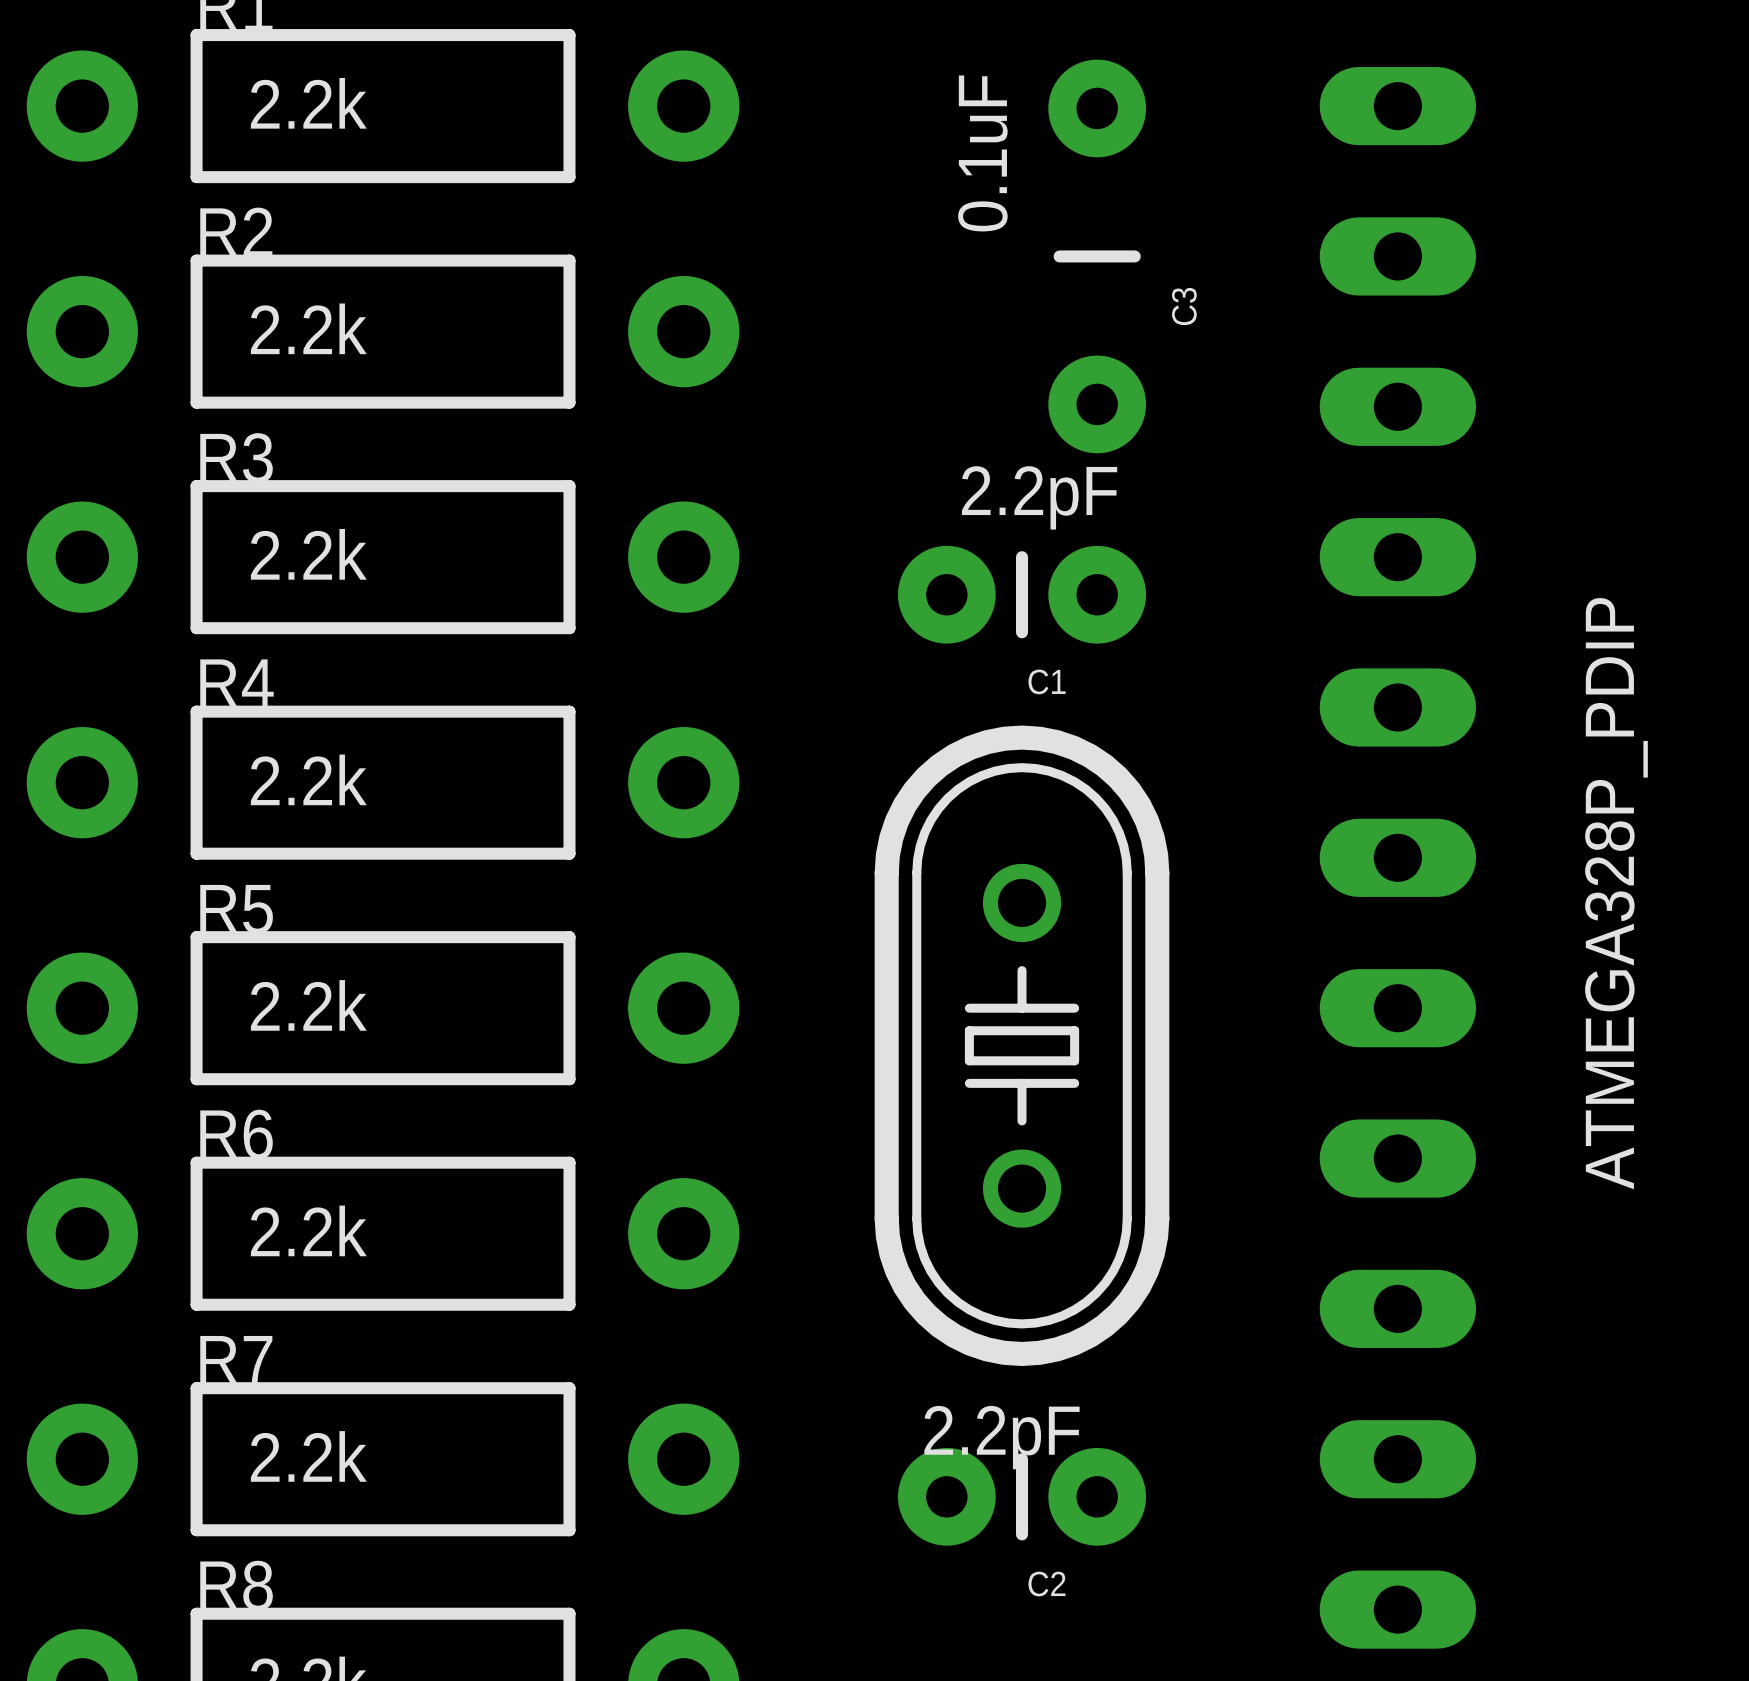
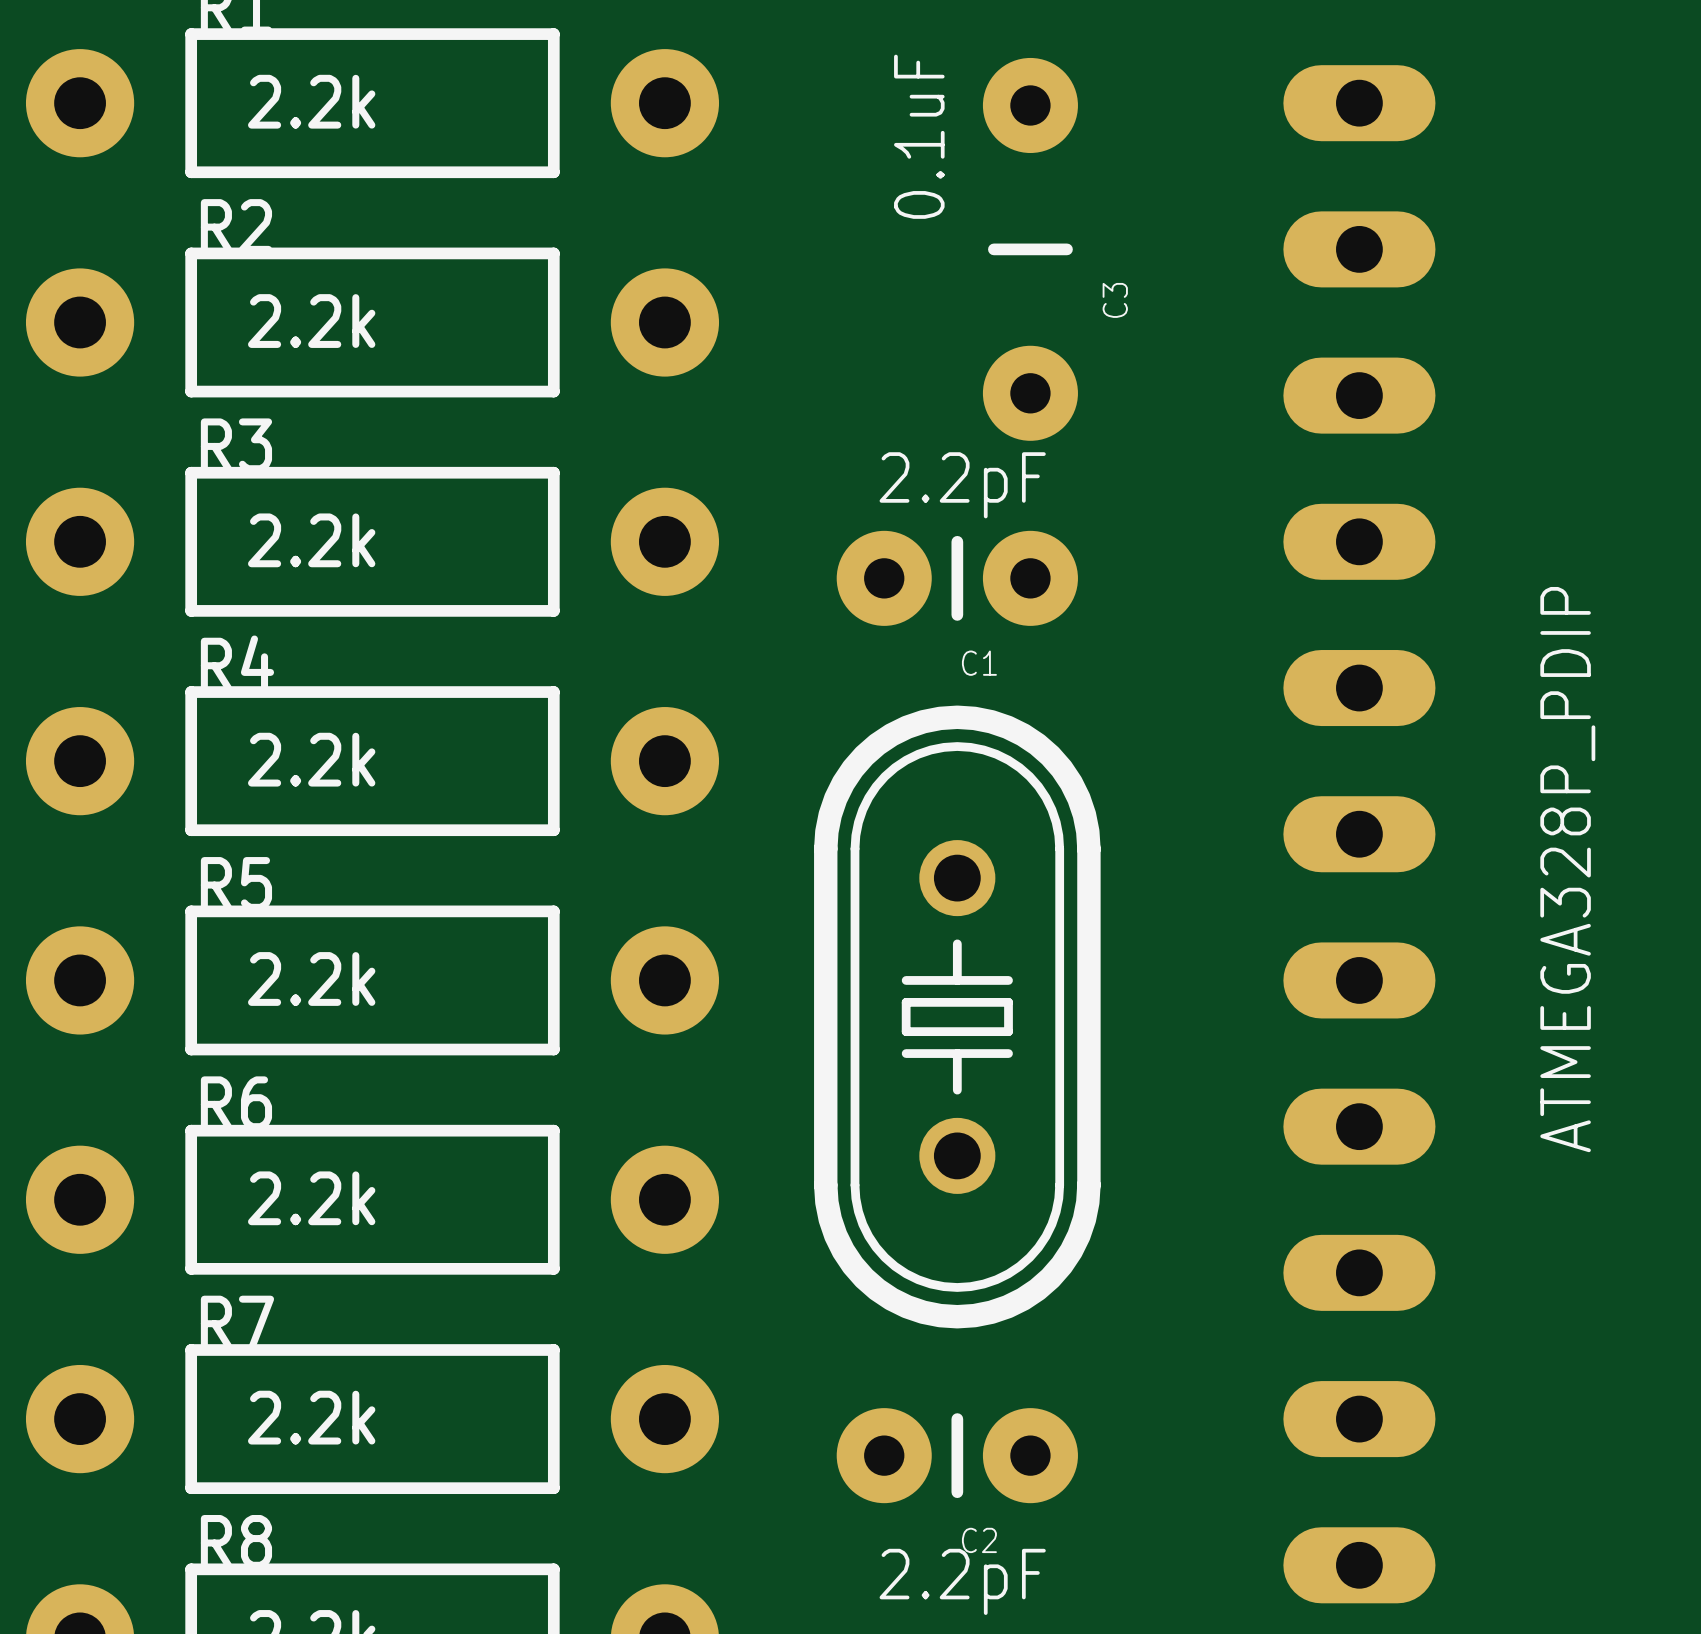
C3 position: (1097, 256) -> (1030, 249)
C1 position: (1022, 594) -> (957, 578)
part position: (1022, 1045) -> (957, 1017)
C2 value position: 2.2pF (1002, 1437) -> 2.2pF (962, 1581)
C2 position: (1022, 1496) -> (957, 1455)

